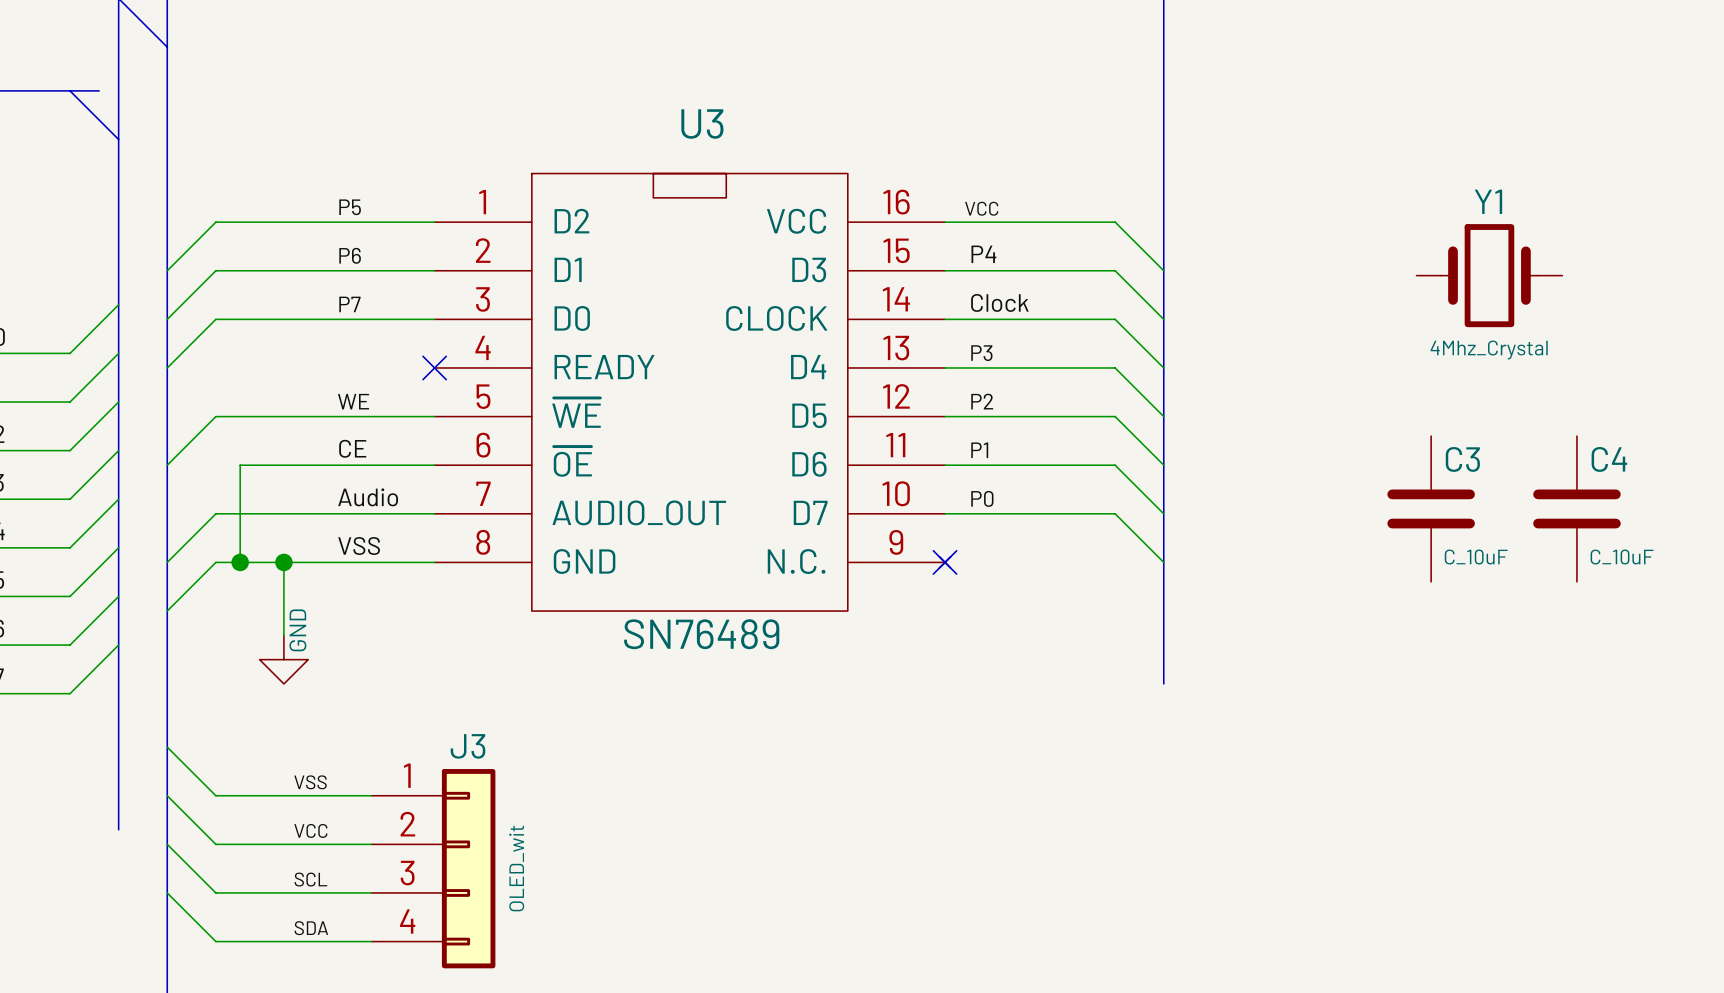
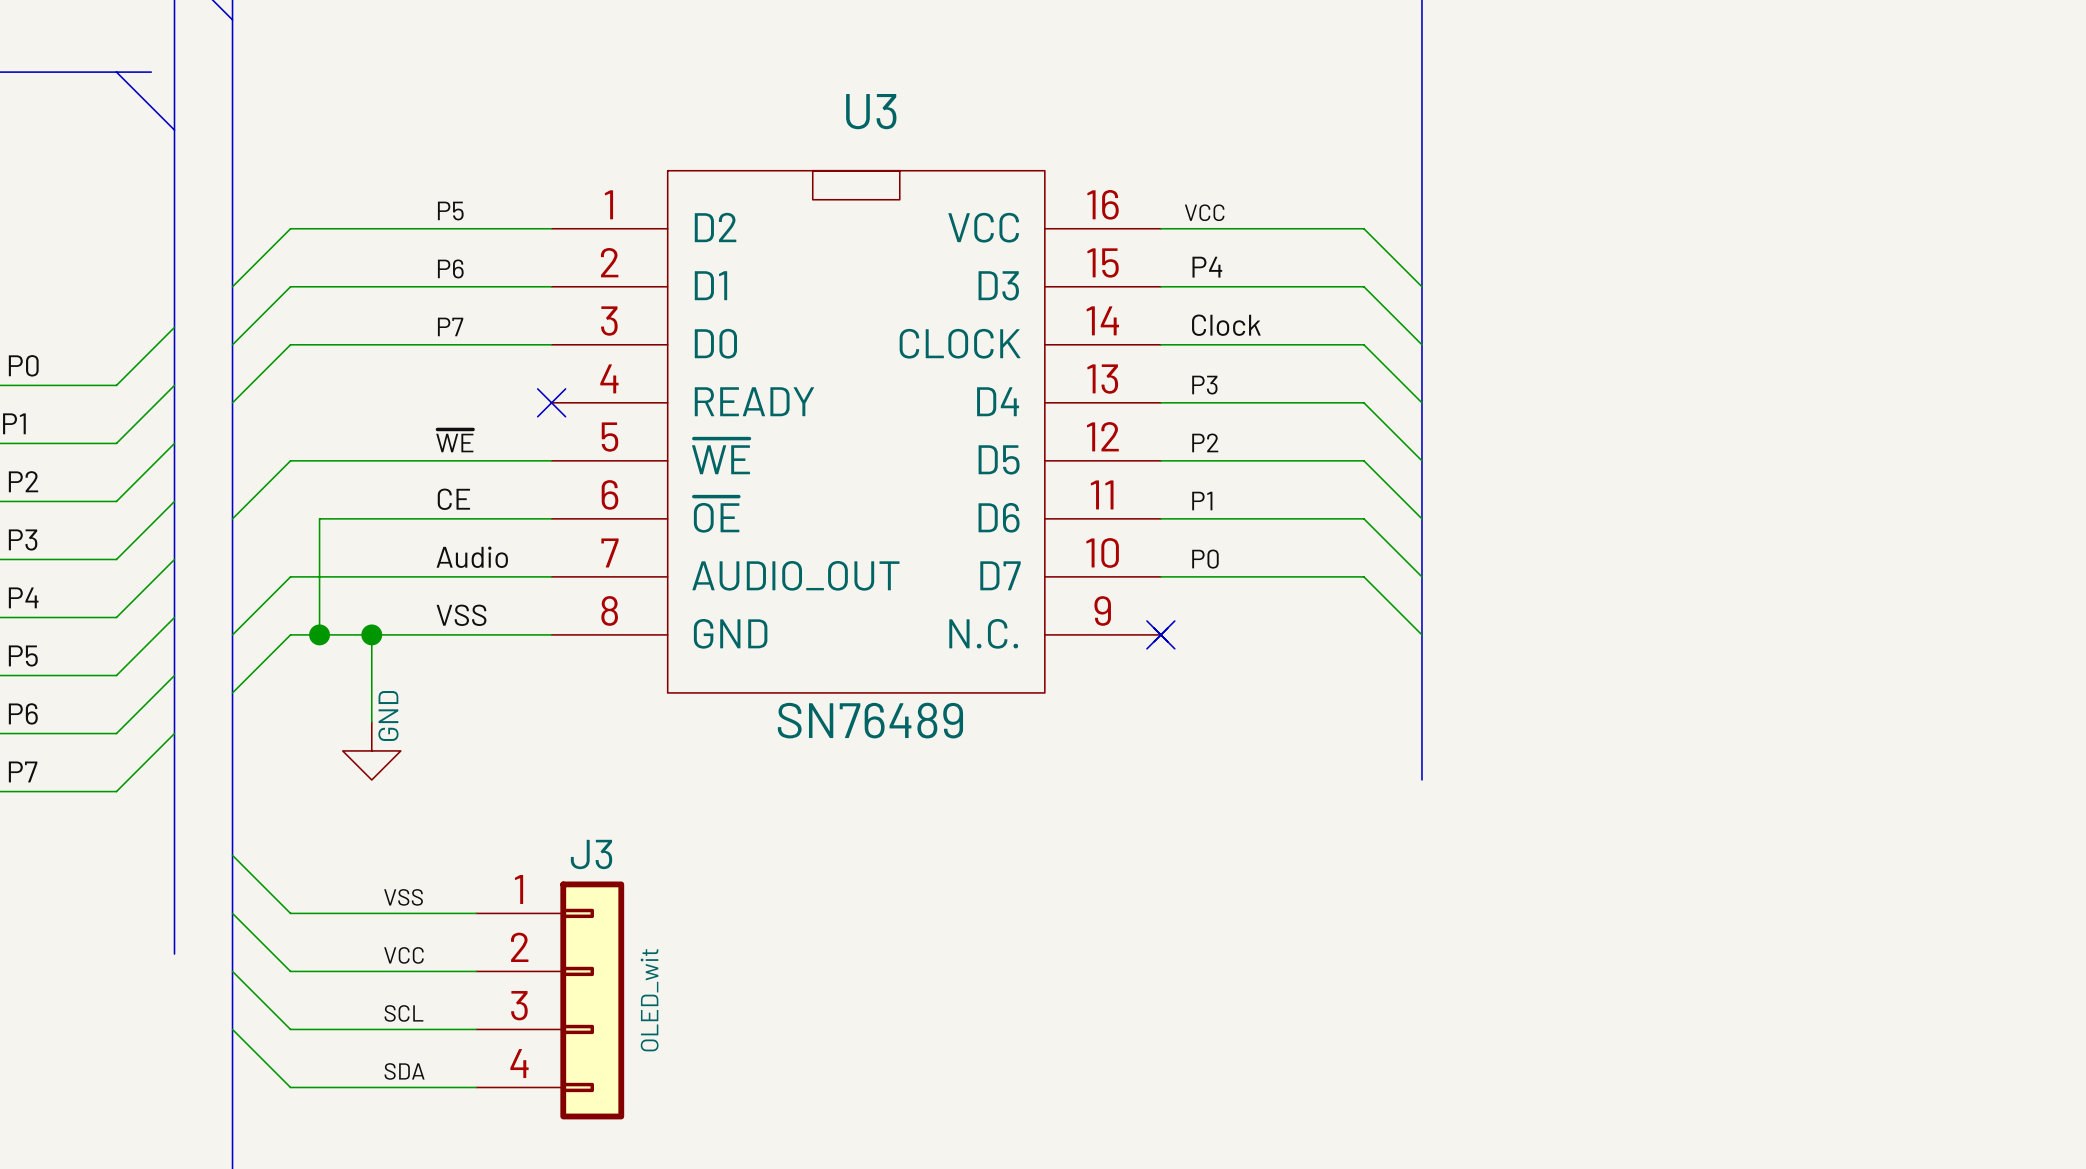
Y1: 4Mhz_Crystal (1489, 275) -> none
label: WE (353, 401) -> ~{WE} (454, 440)
C3: C_10uF (1431, 508) -> none
C4: C_10uF (1576, 508) -> none

